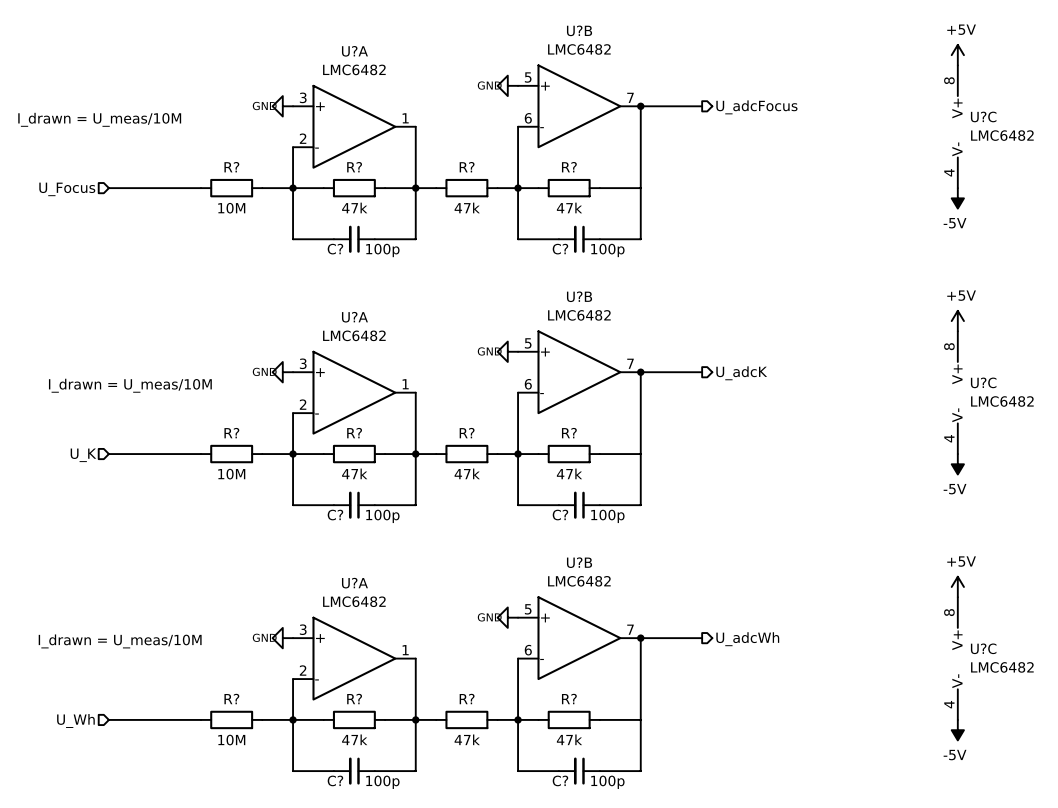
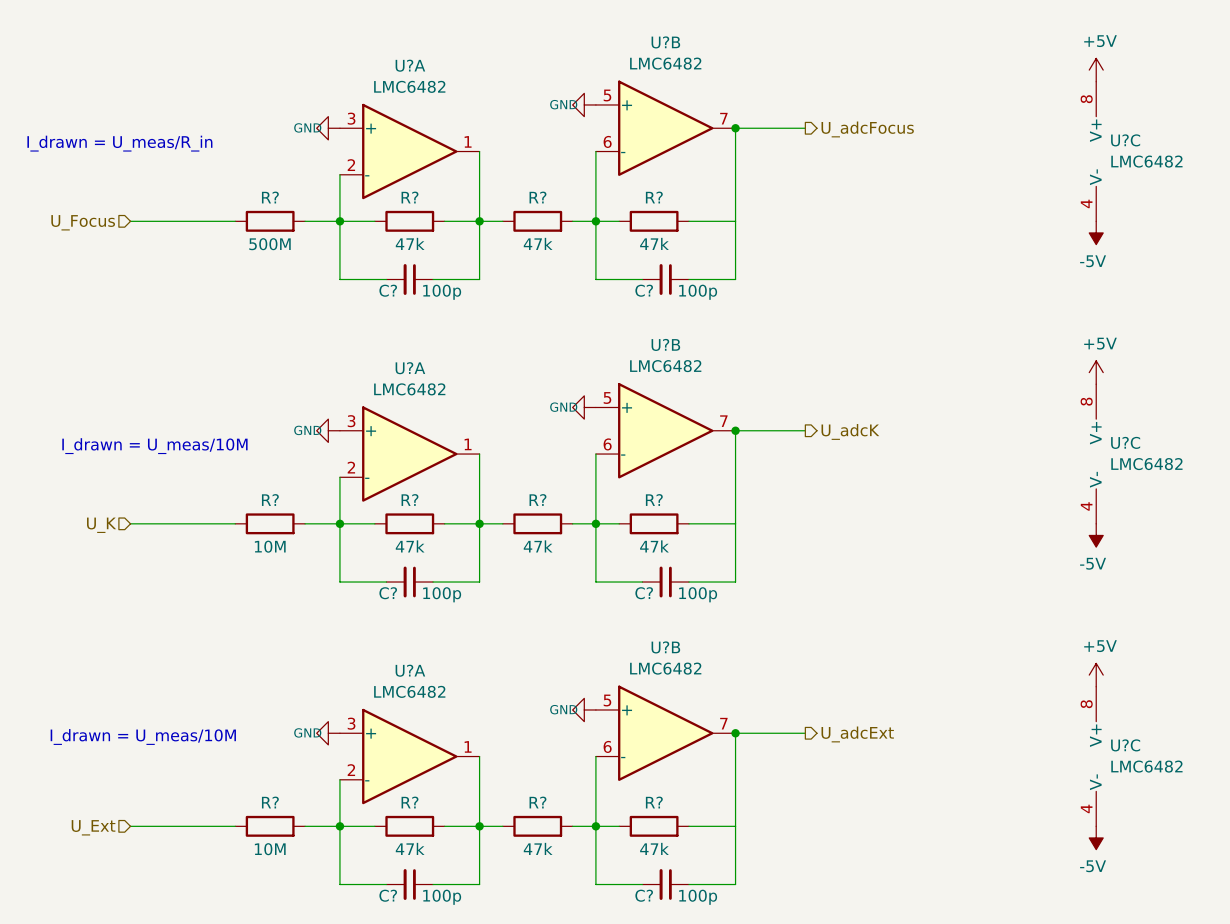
text: I_drawn = U_meas/10M (99, 119) -> I_drawn = U_meas/R_in (119, 143)
R? value: 10M (231, 208) -> 500M (269, 244)
hierarchical label: U_adcWh (747, 639) -> U_adcExt (857, 734)
hierarchical label: U_Wh (75, 721) -> U_Ext (93, 827)

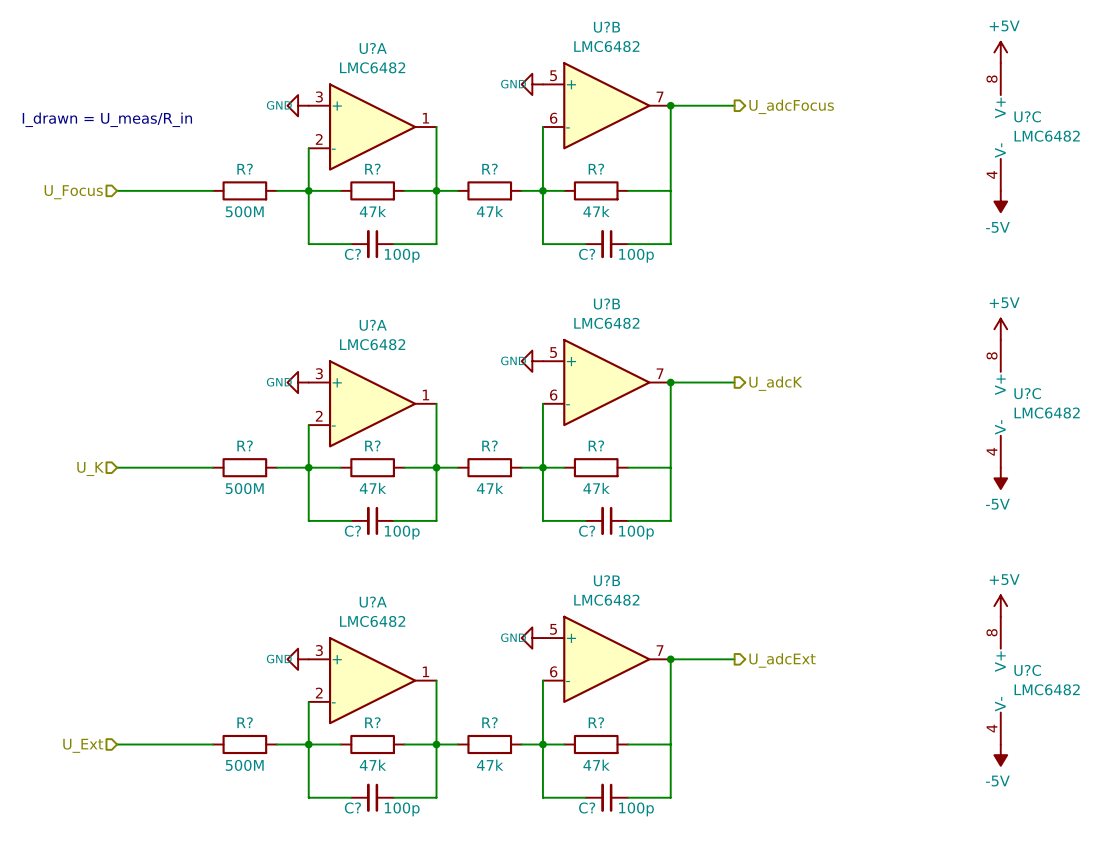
text: I_drawn = U_meas/10M (154, 446) -> none
R? value: 10M (270, 546) -> 500M (244, 488)
text: I_drawn = U_meas/10M (143, 737) -> none
R? value: 10M (270, 849) -> 500M (244, 765)

